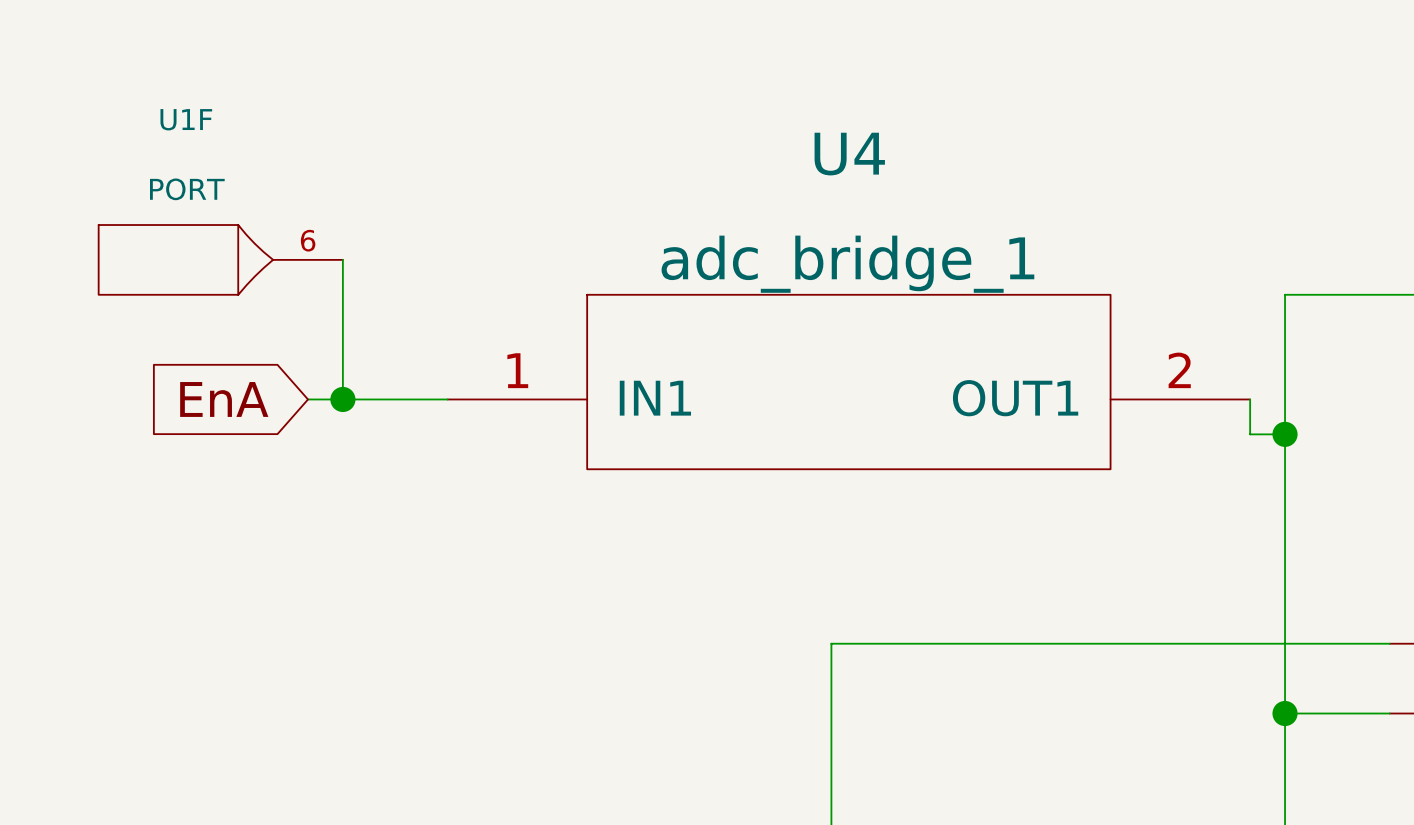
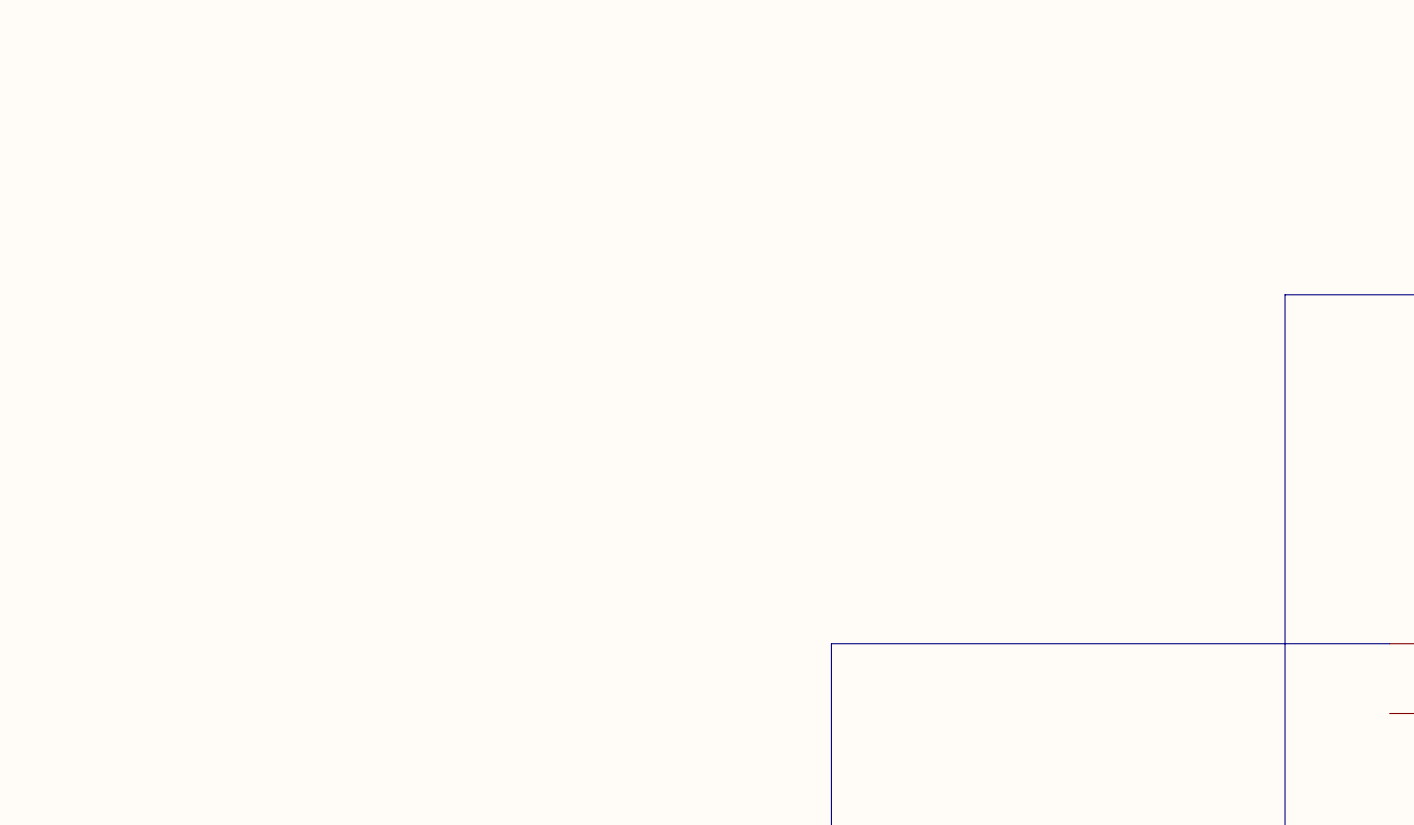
U1F: PORT (220, 259) -> none
wire: (342, 259) (342, 399) -> none
U4: adc_bridge_1 (848, 382) -> none
global label: EnA (224, 399) -> none
wire: (308, 399) (447, 399) -> none
junction: (342, 399) -> none
wire: (1250, 399) (1250, 434) (1285, 434) -> none
junction: (1285, 434) -> none
wire: (1285, 713) (1389, 713) -> none
junction: (1285, 713) -> none

